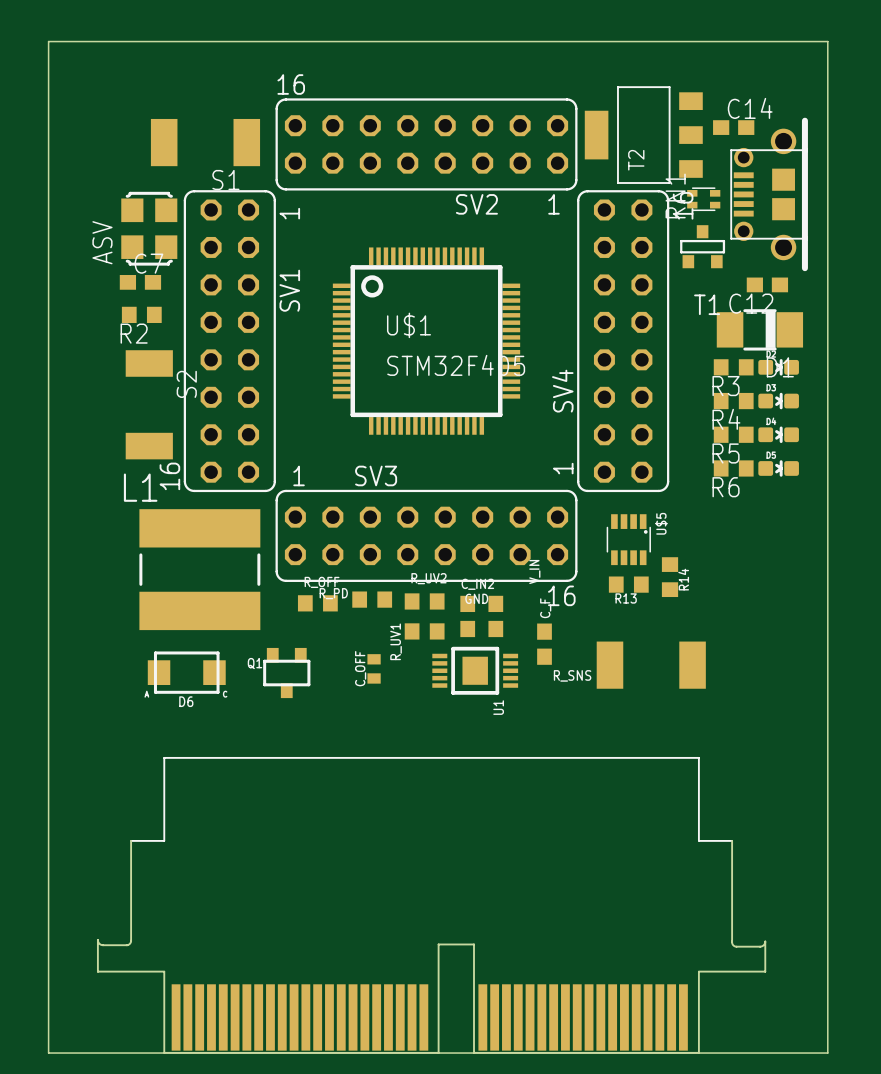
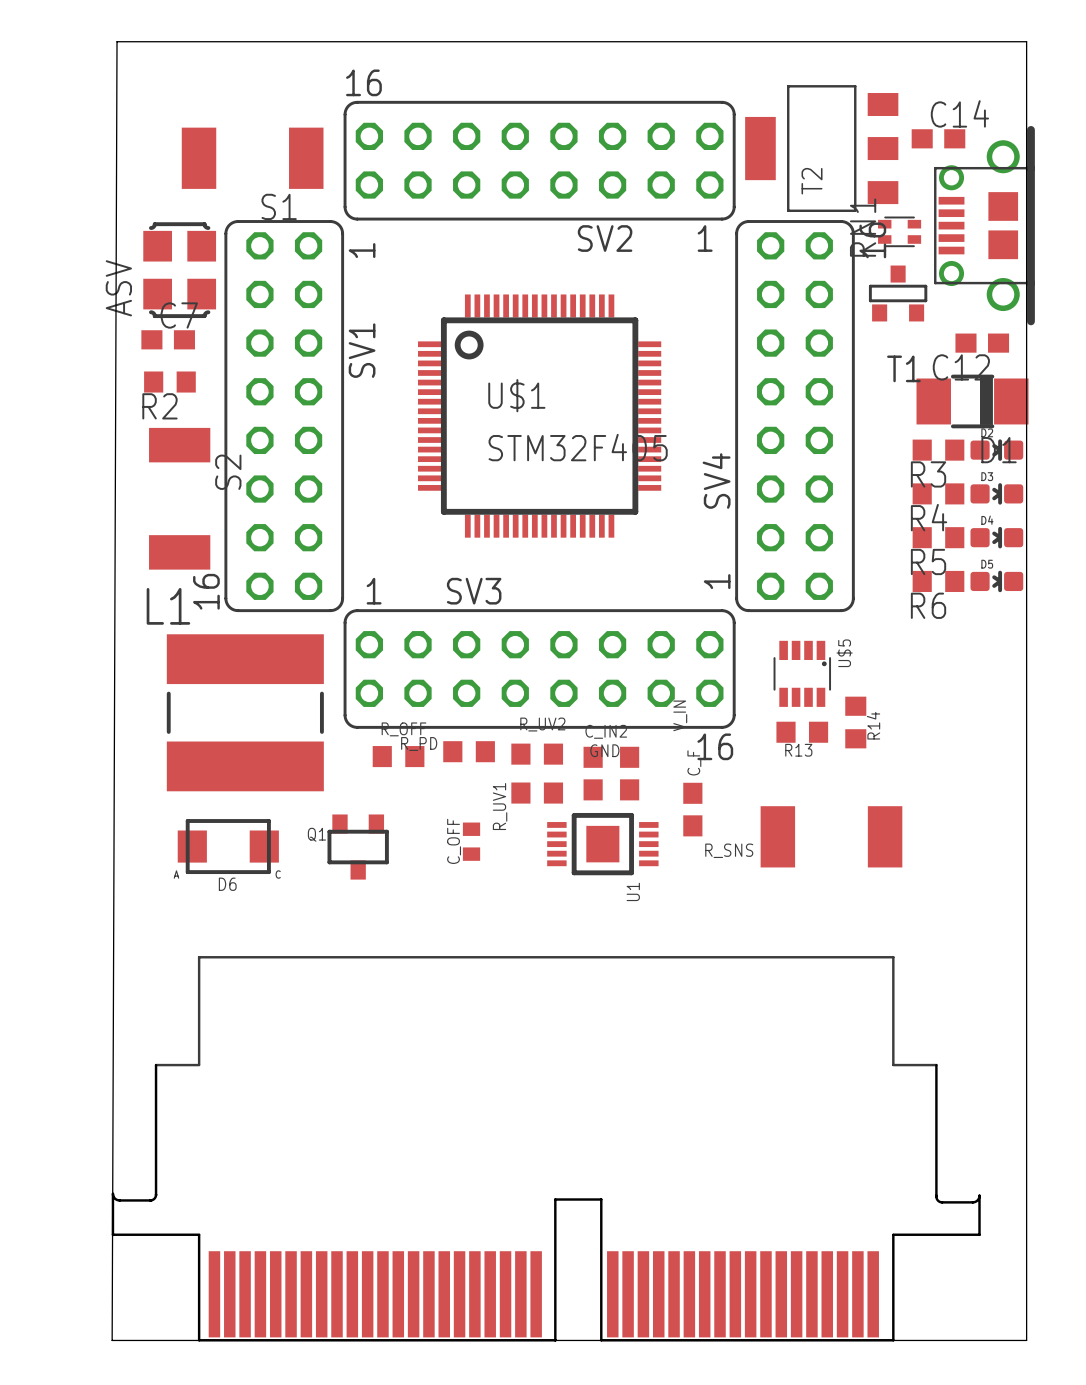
board edge: (97, 1053) (48, 1053) (48, 41) (827, 41) (827, 1053) (801, 1053) -> (112, 1340) (117, 41) (1026, 41) (1026, 1340)

